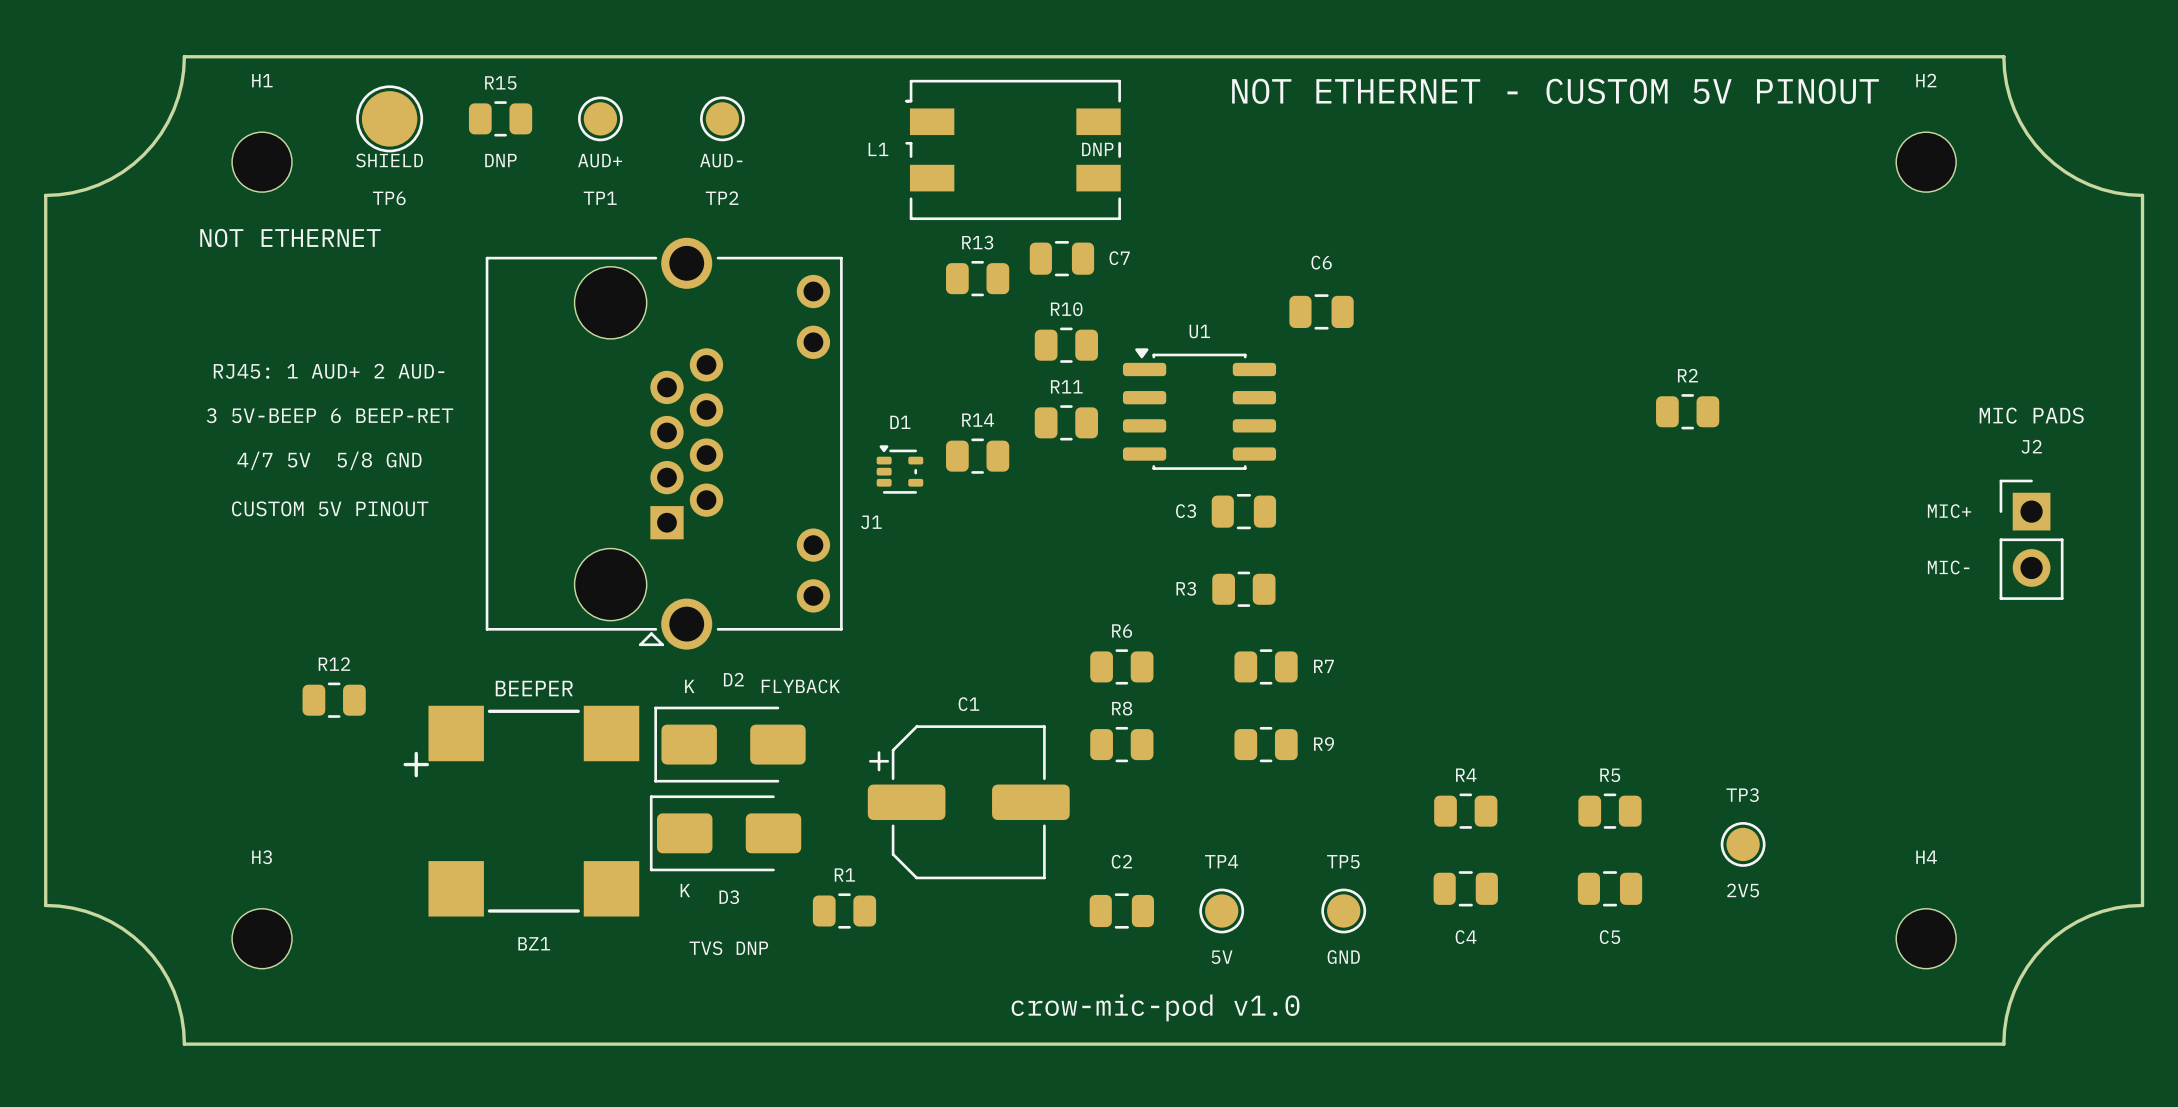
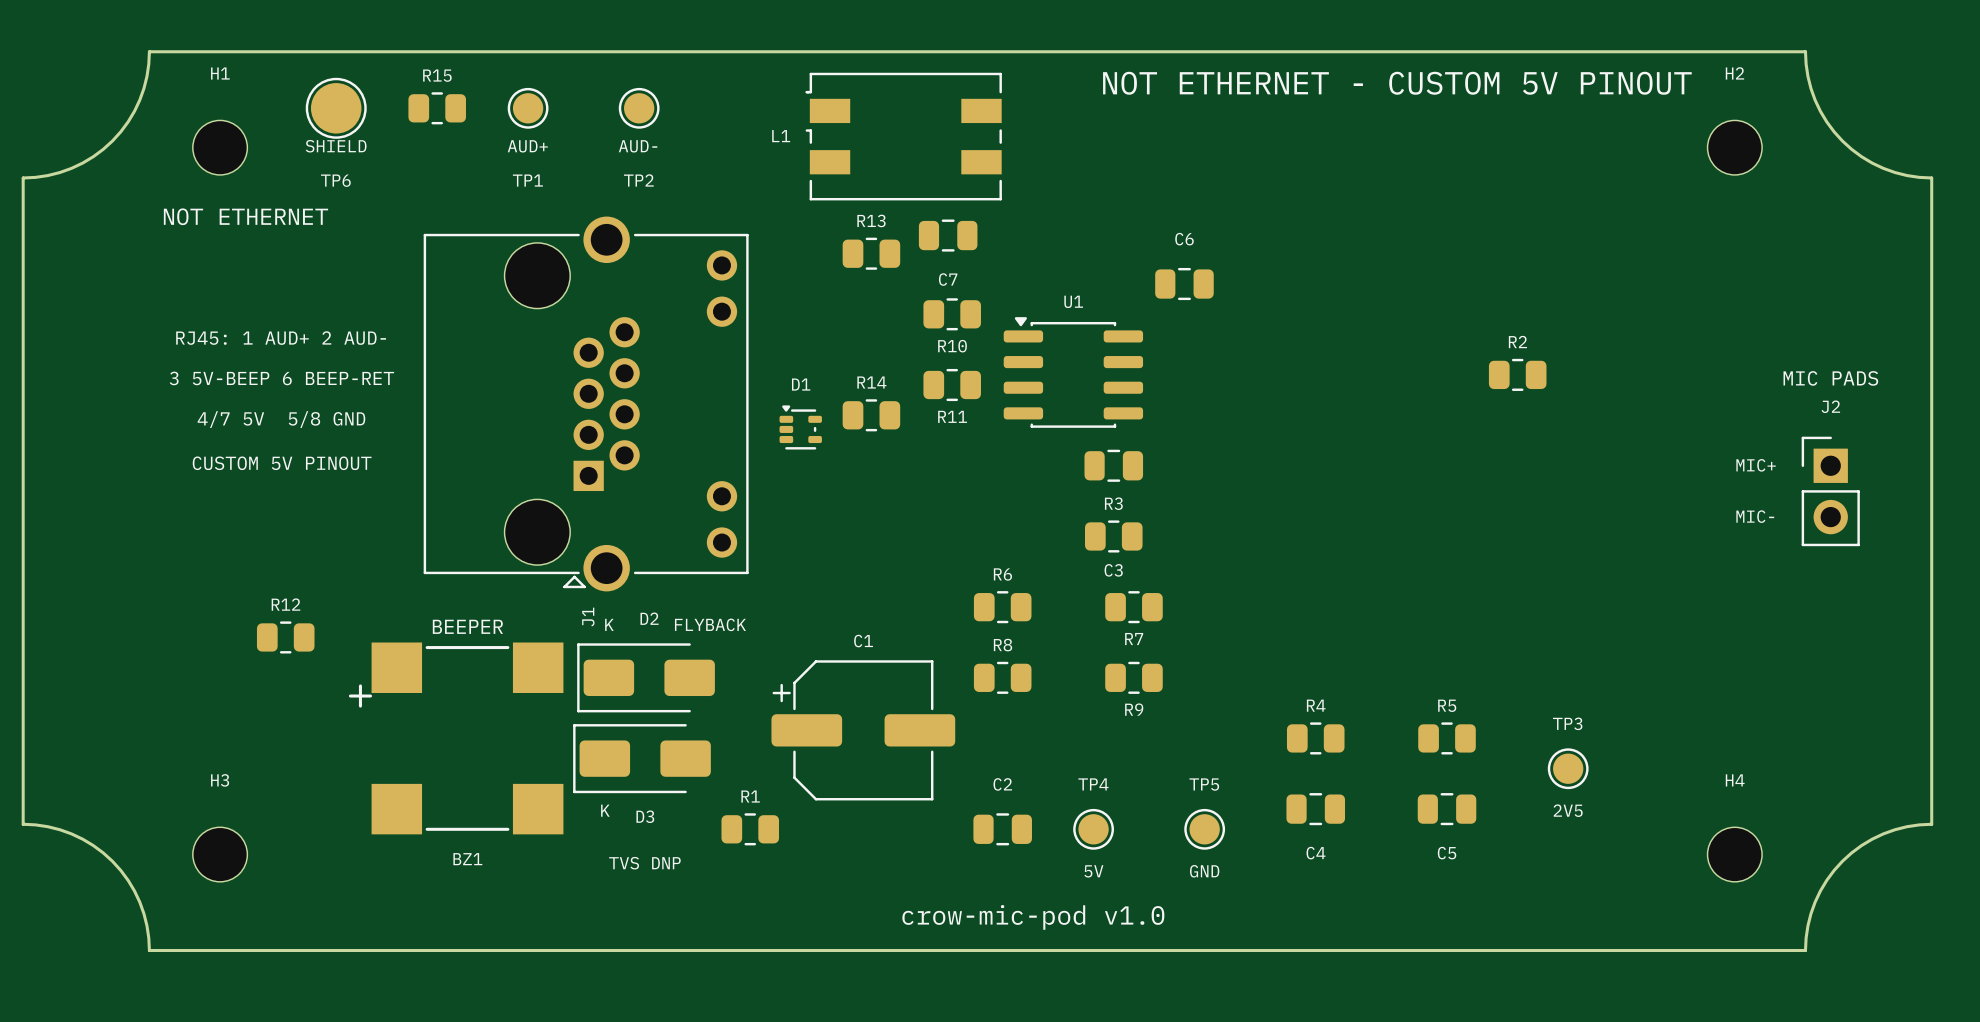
text: DNP (1097, 149) -> none
text: DNP (500, 160) -> none
C7 name position: C7 (1119, 258) -> C7 (948, 279)
R10 name position: R10 (1066, 309) -> R10 (952, 346)
R11 name position: R11 (1066, 386) -> R11 (952, 416)
C3 name position: C3 (1186, 511) -> C3 (1113, 570)
J1 name rotation: 0° (871, 522) -> 90° counterclockwise (588, 617)
J1 name position: J1 (871, 522) -> J1 (588, 617)
R3 name position: R3 (1186, 588) -> R3 (1113, 503)
R7 name position: R7 (1323, 666) -> R7 (1134, 639)
R9 name position: R9 (1324, 743) -> R9 (1134, 709)

